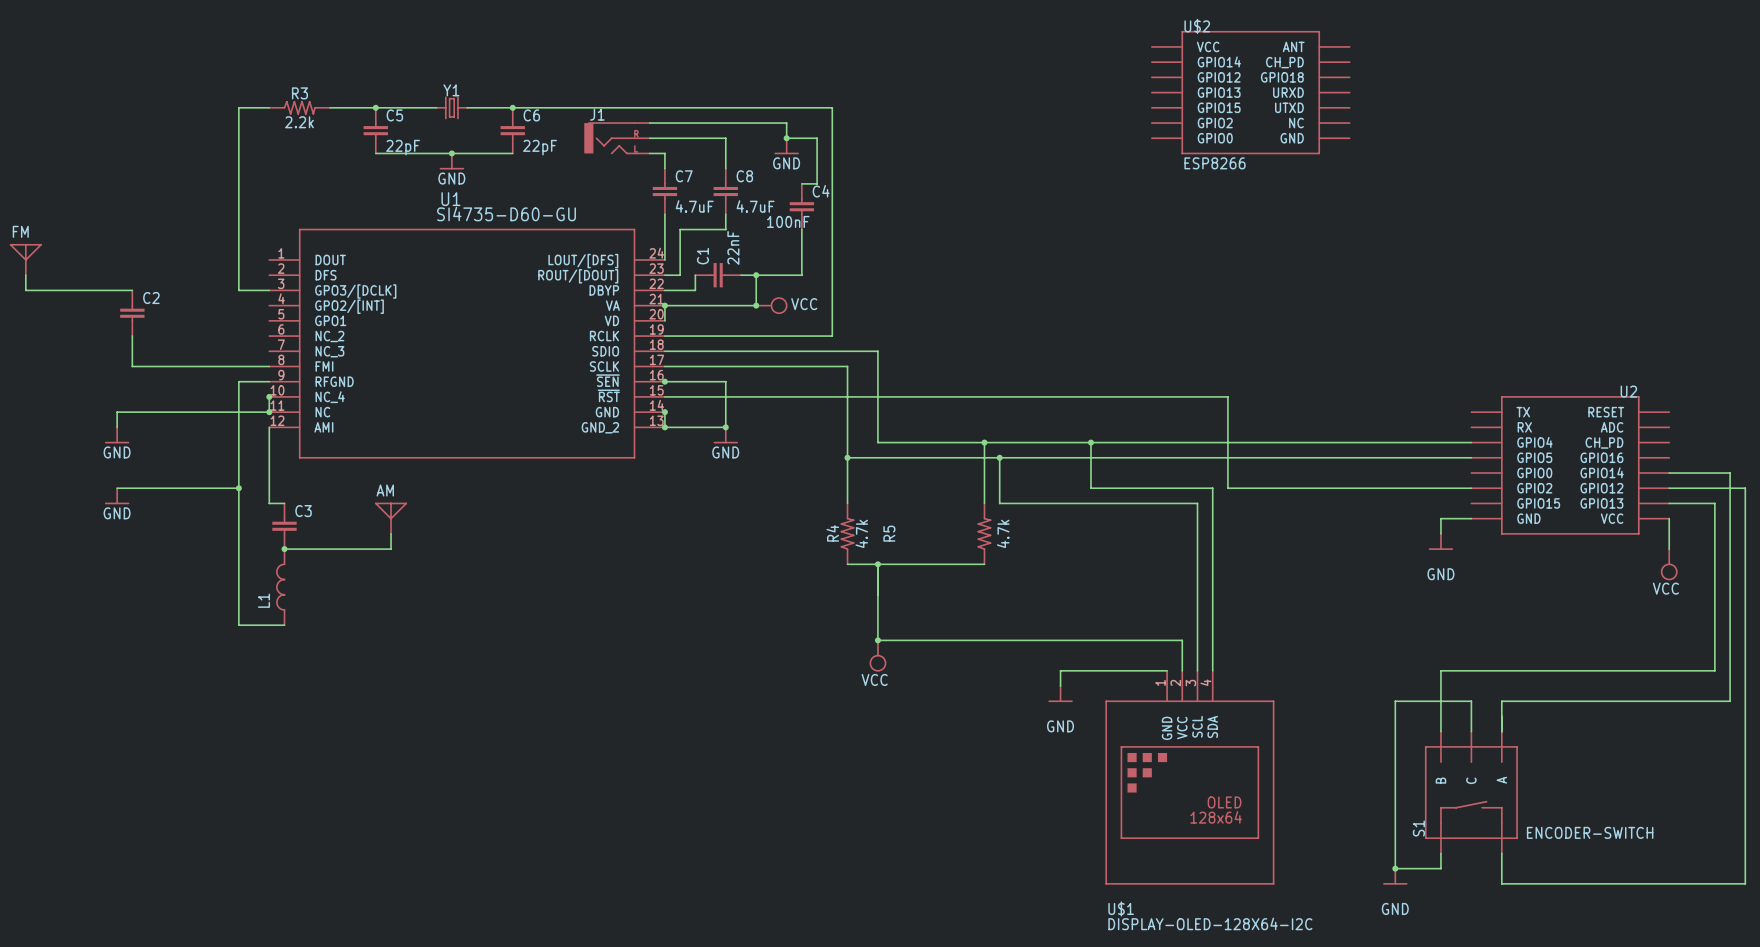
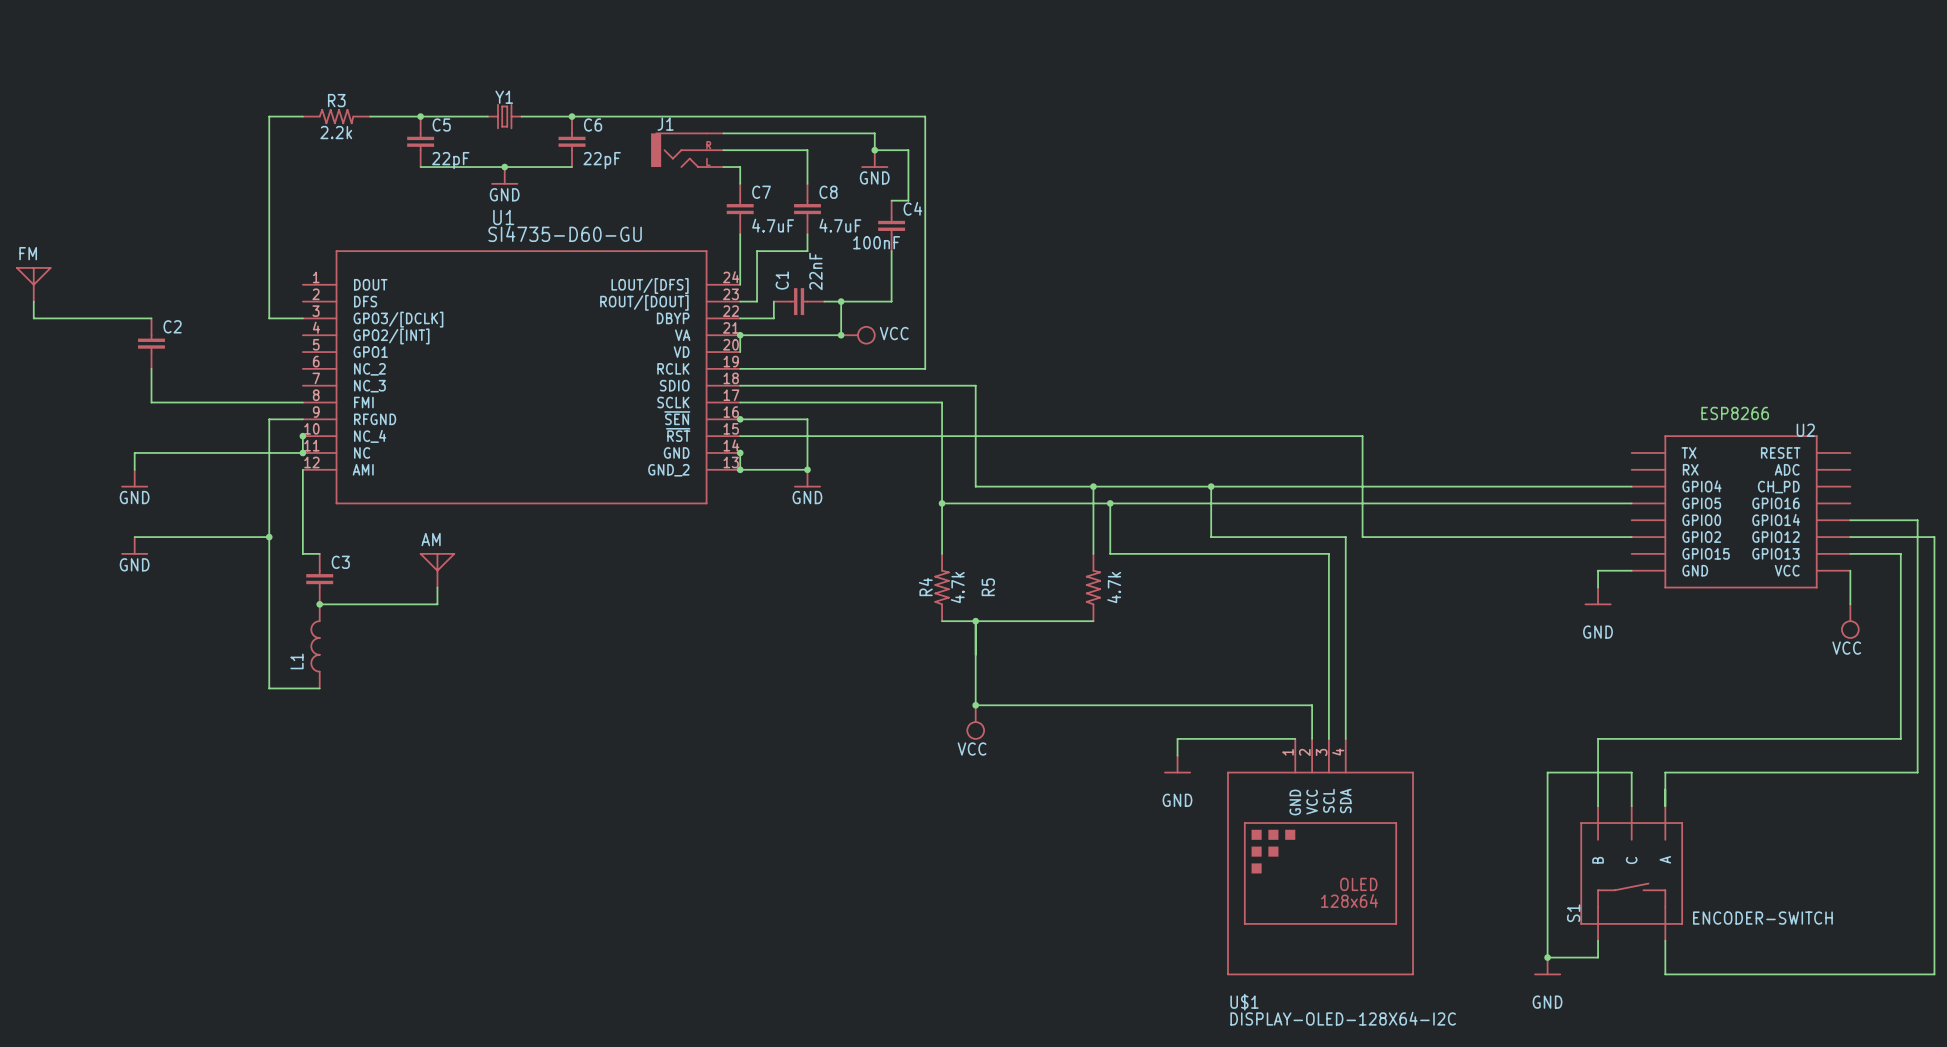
U$2: ESP8266 (1250, 92) -> none
text: none -> ESP8266 (1735, 413)

